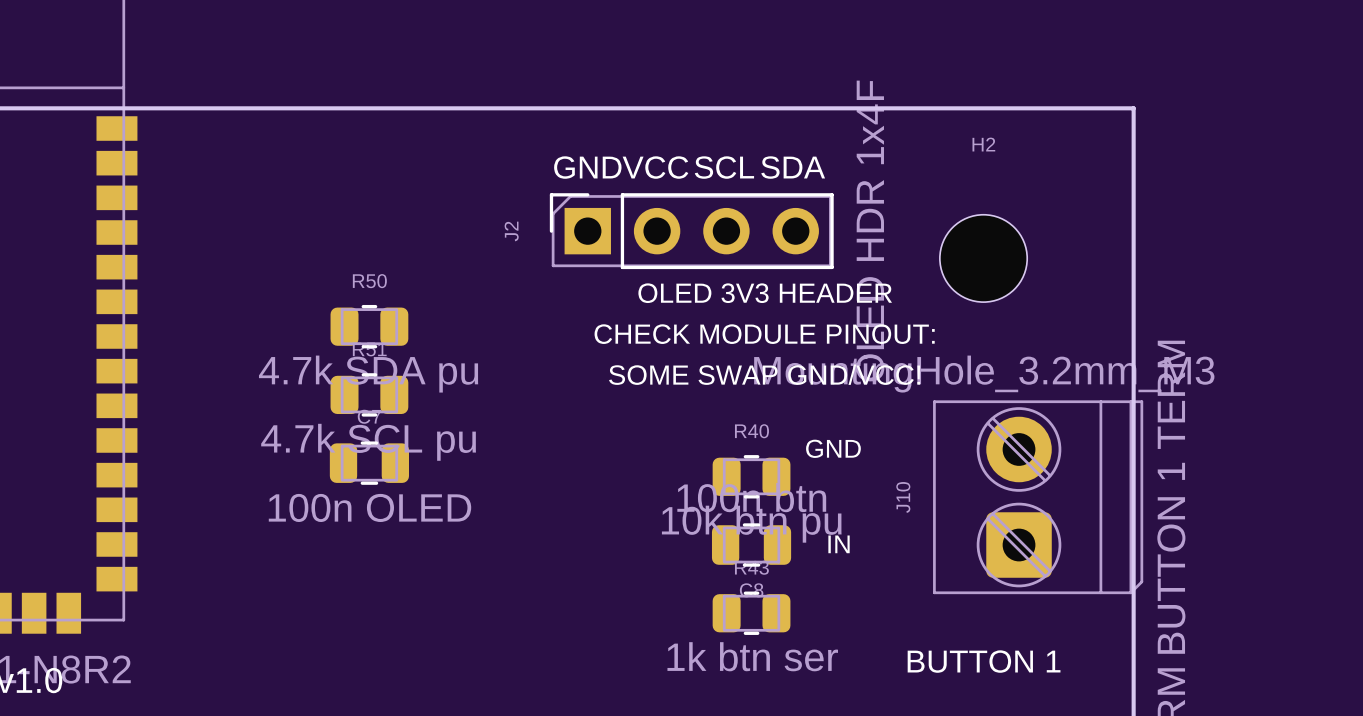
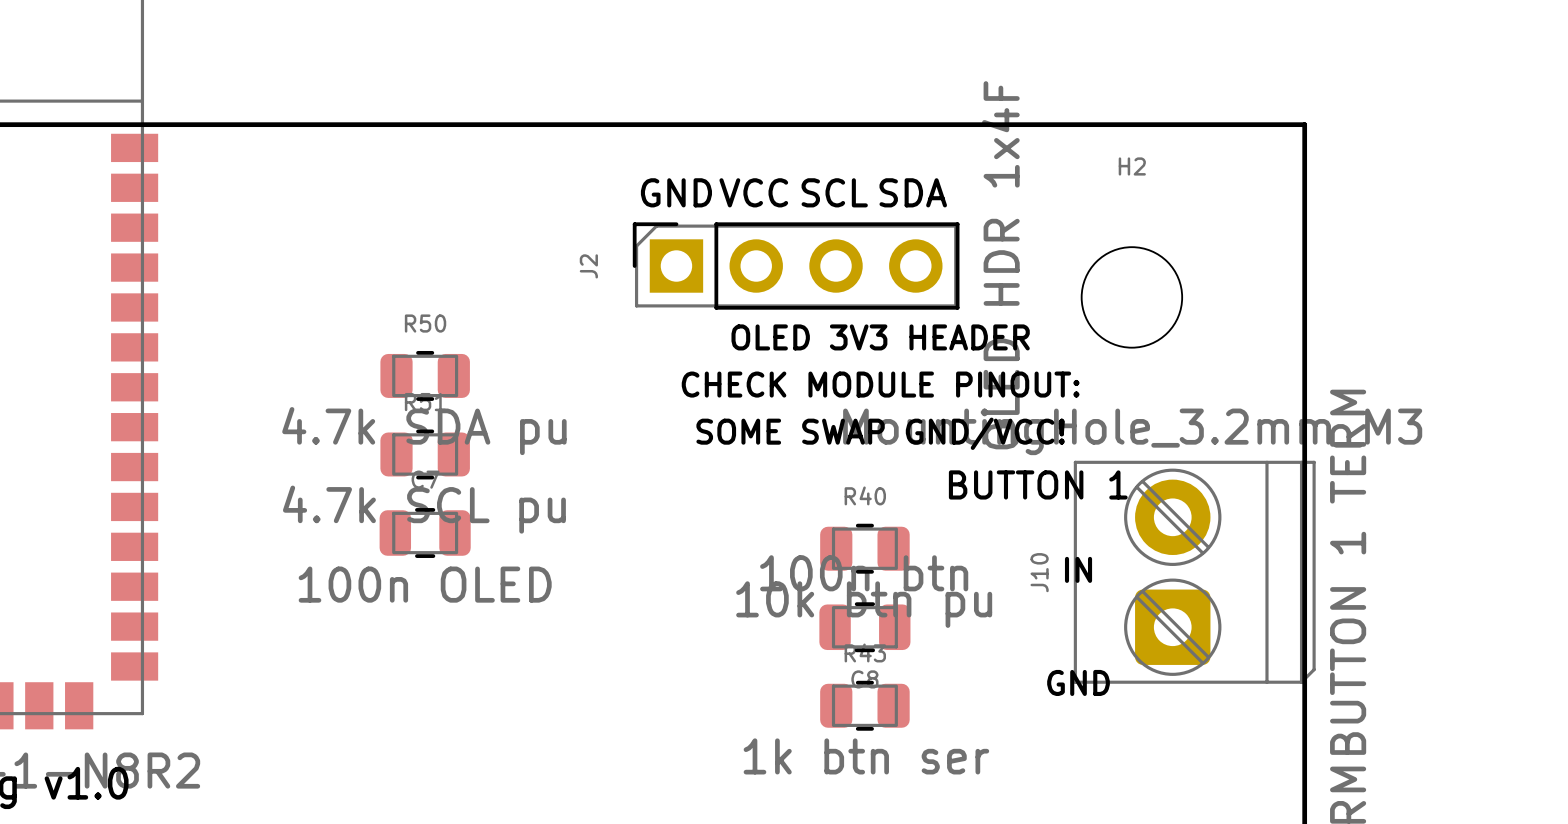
text position: GND (833, 448) -> GND (1078, 682)
text position: IN (839, 544) -> IN (1078, 569)
text position: BUTTON 1 (984, 661) -> BUTTON 1 (1038, 484)

